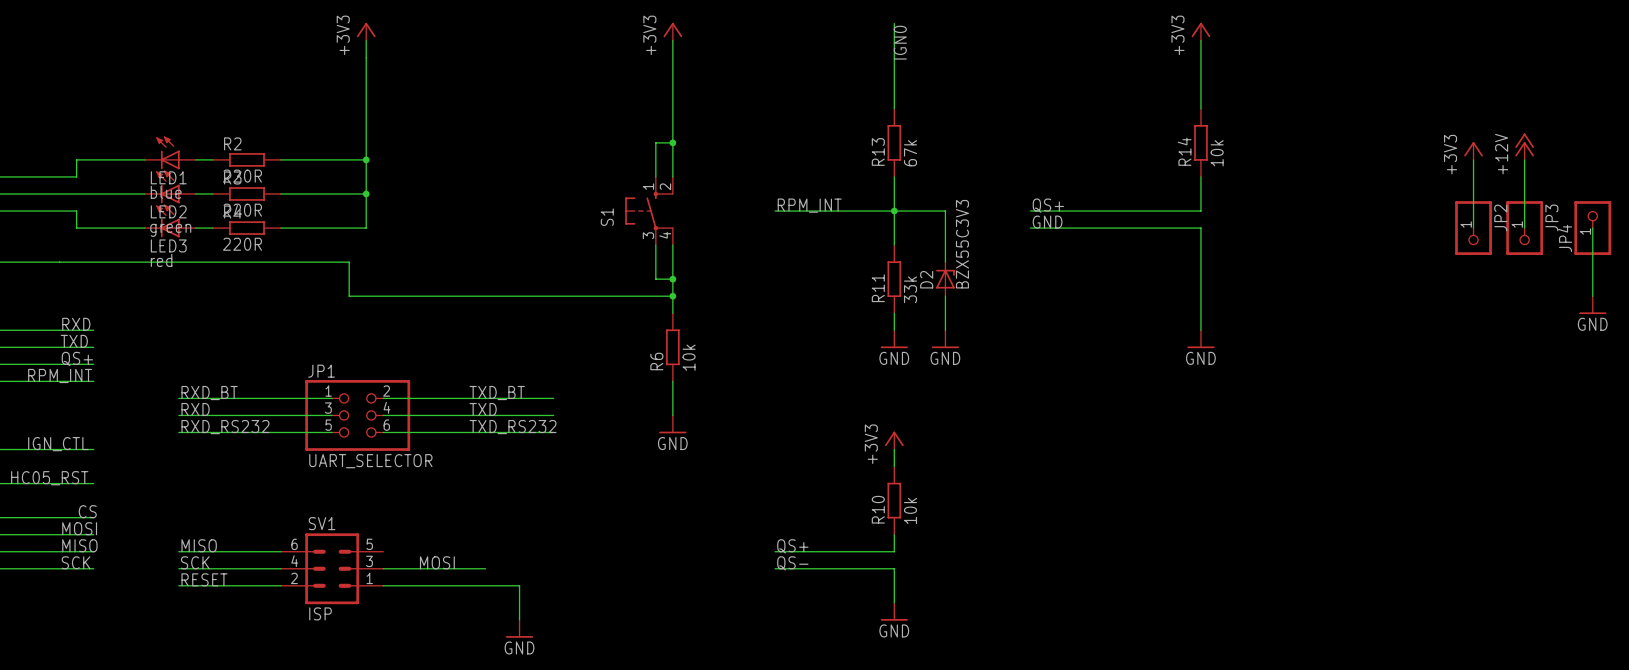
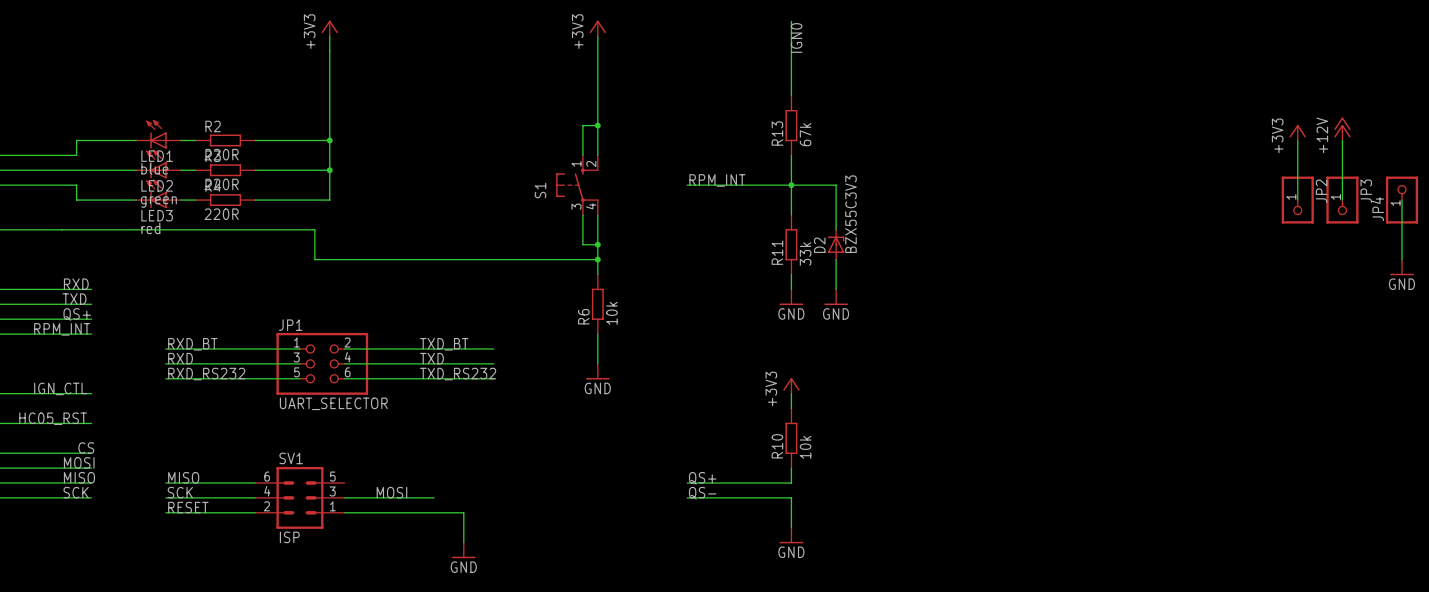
power symbol: +3V3 (1200, 31) -> none
wire: (1200, 40) (1200, 108) -> none
R14: 10k (1200, 142) -> none
wire: (1200, 176) (1200, 211) (1030, 211) -> none
label: QS+ (1048, 205) -> none
label: GND (1047, 222) -> none
wire: (1030, 228) (1200, 228) (1200, 330) -> none
power symbol: GND (1200, 339) -> none

